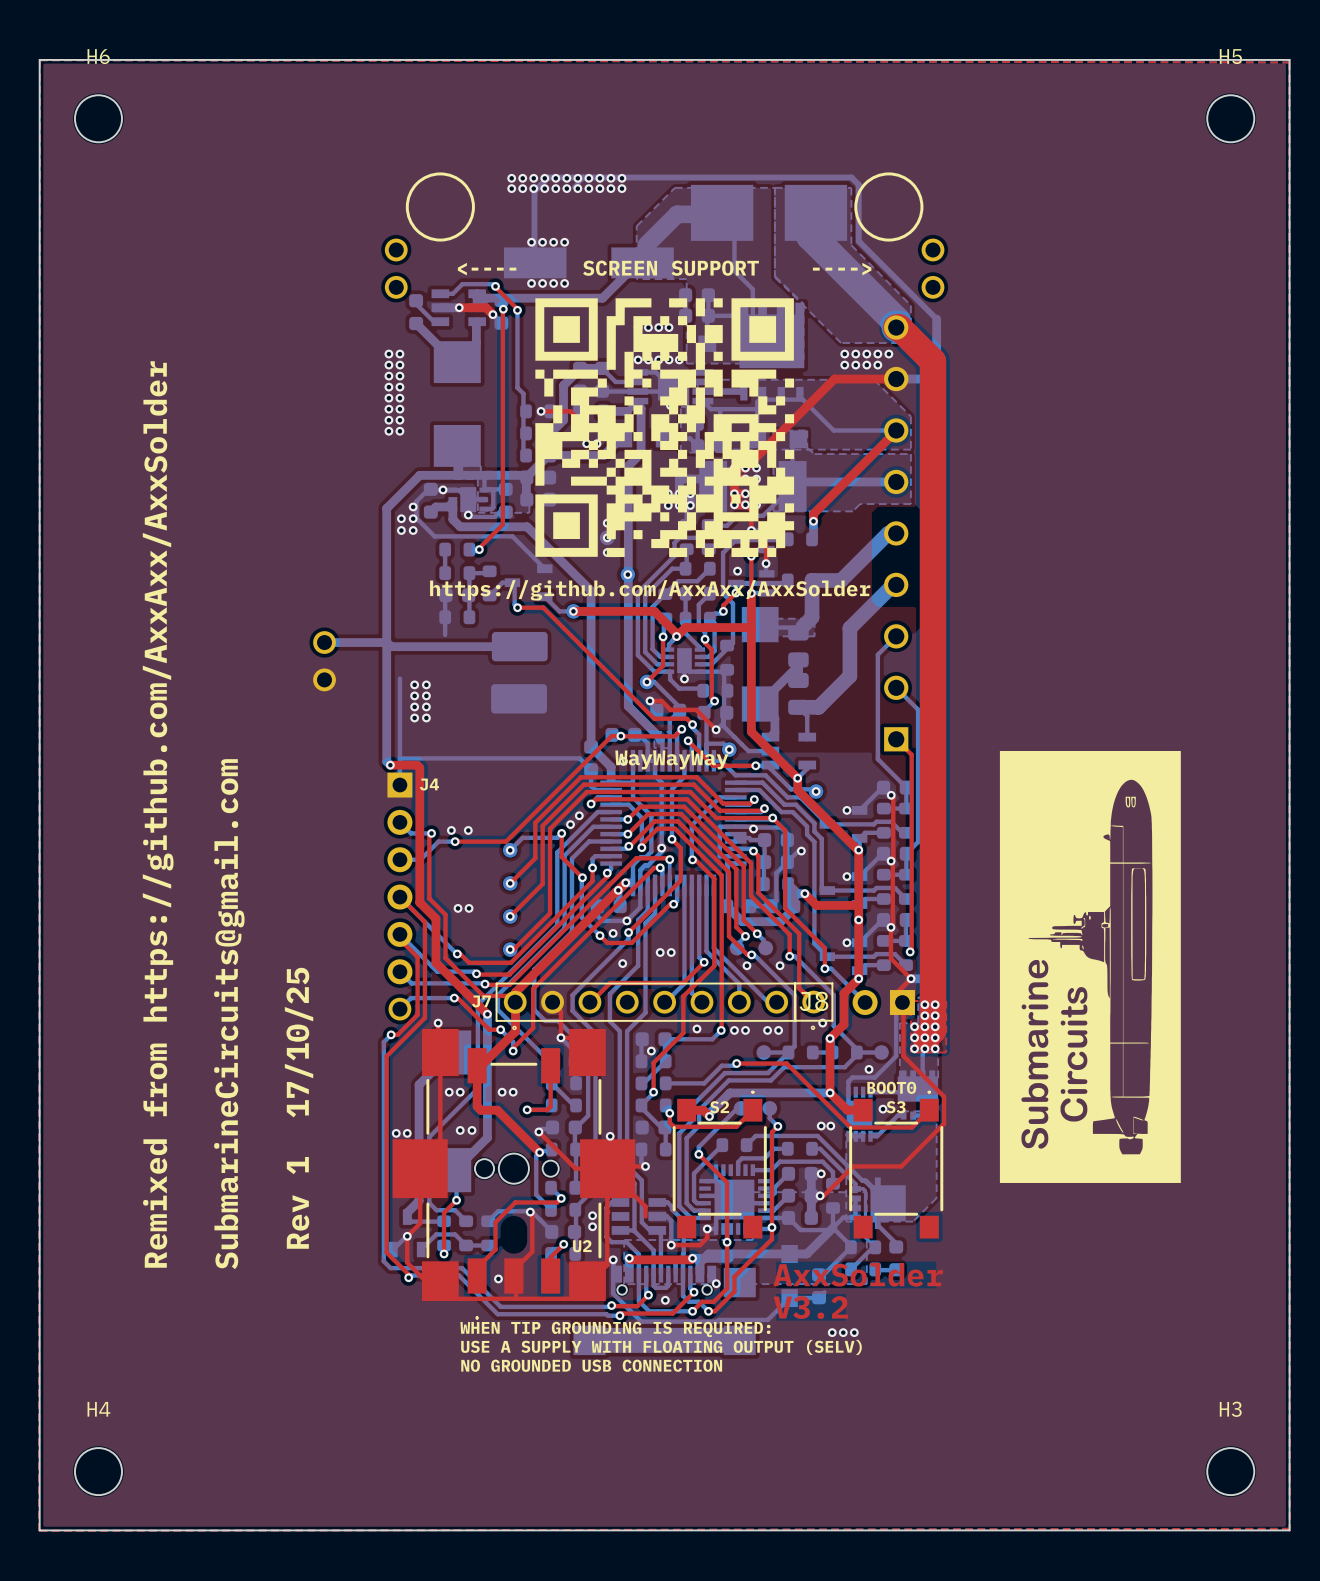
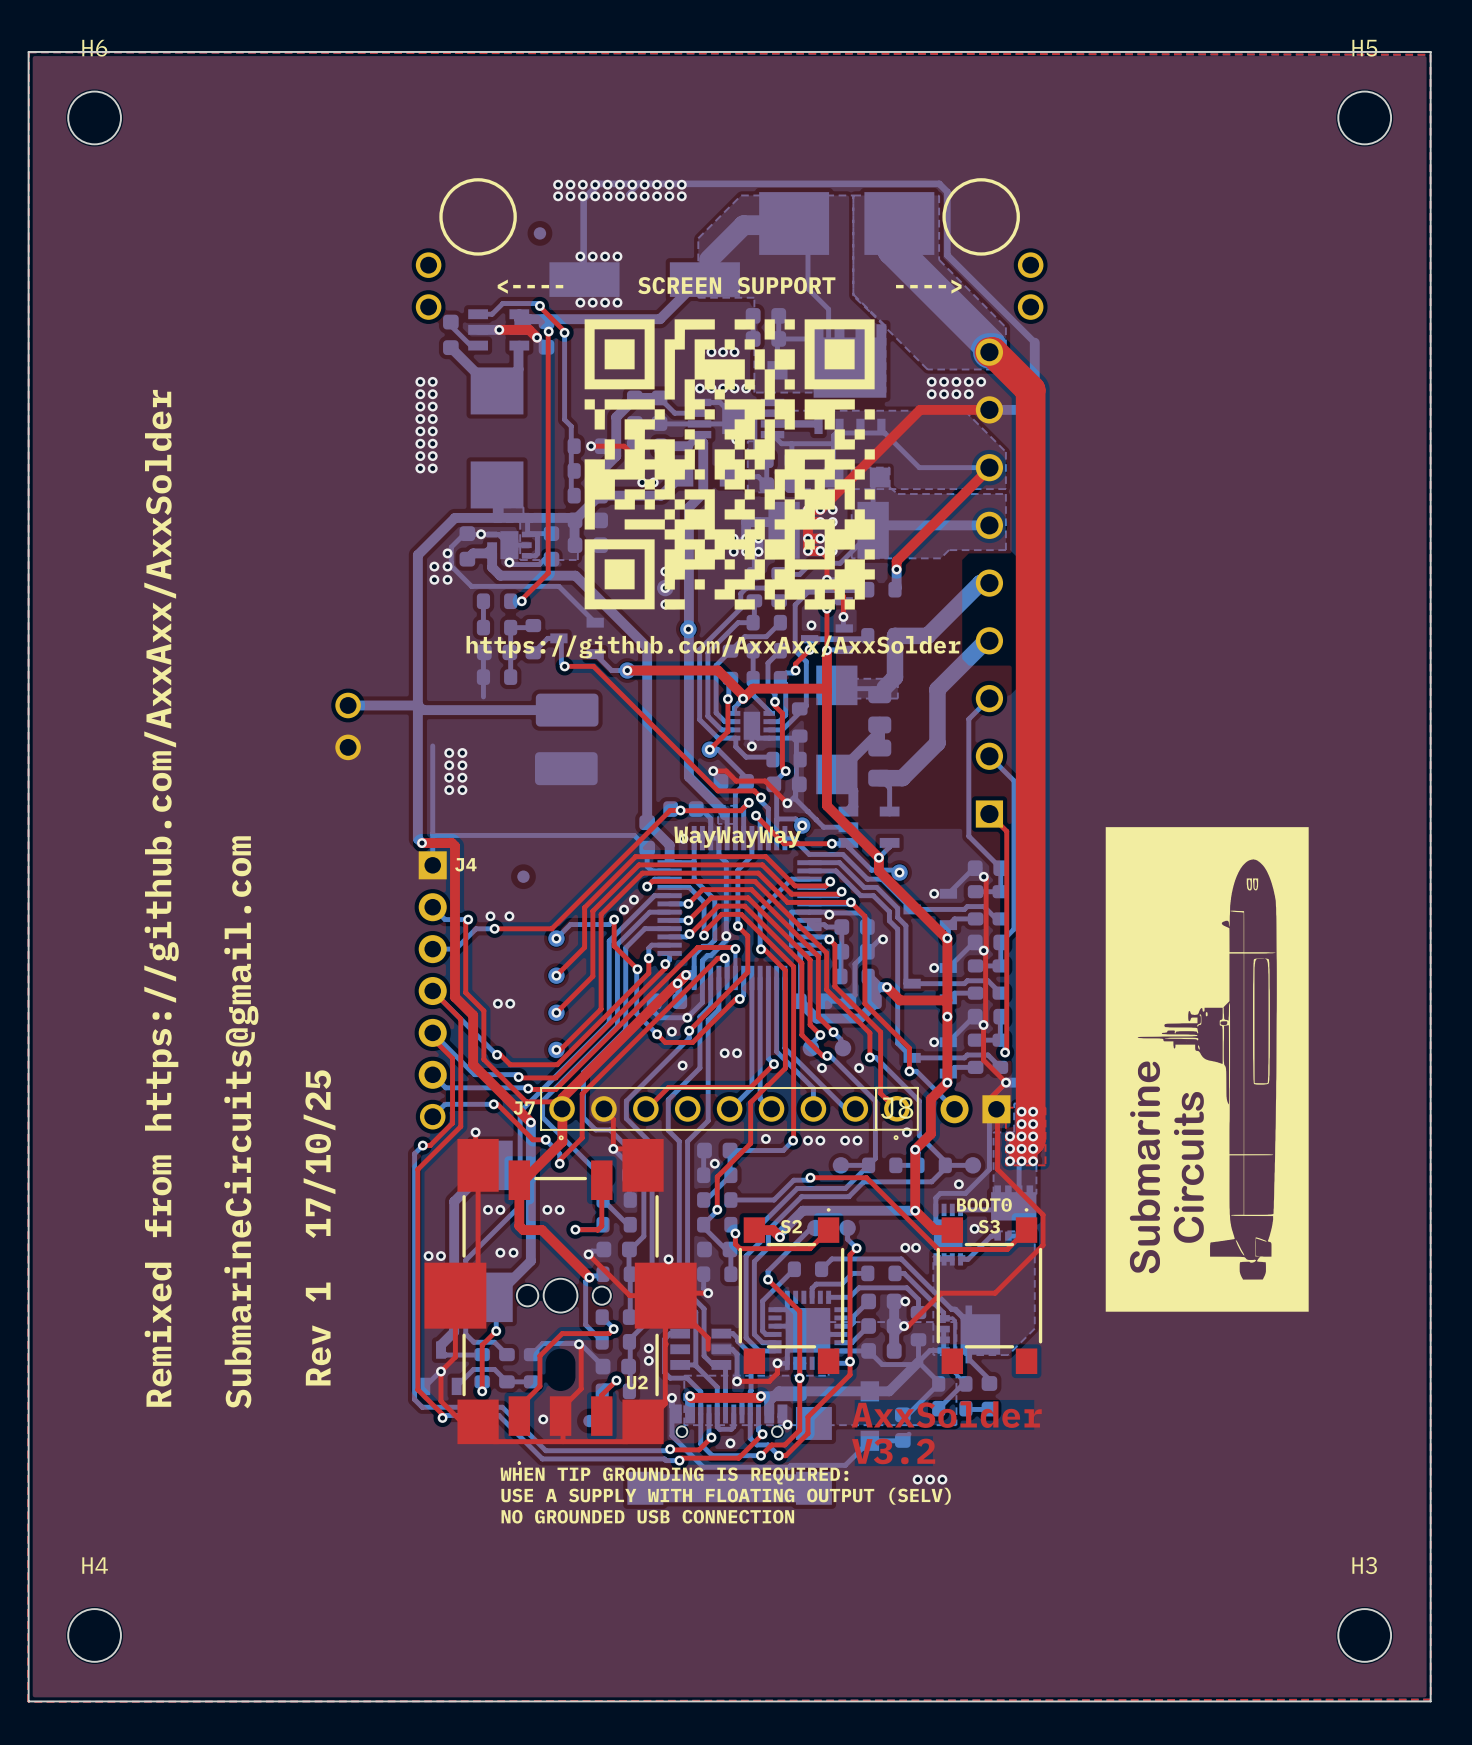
part: none -> (539, 233)
part: none -> (523, 876)
part: none -> (589, 1421)

